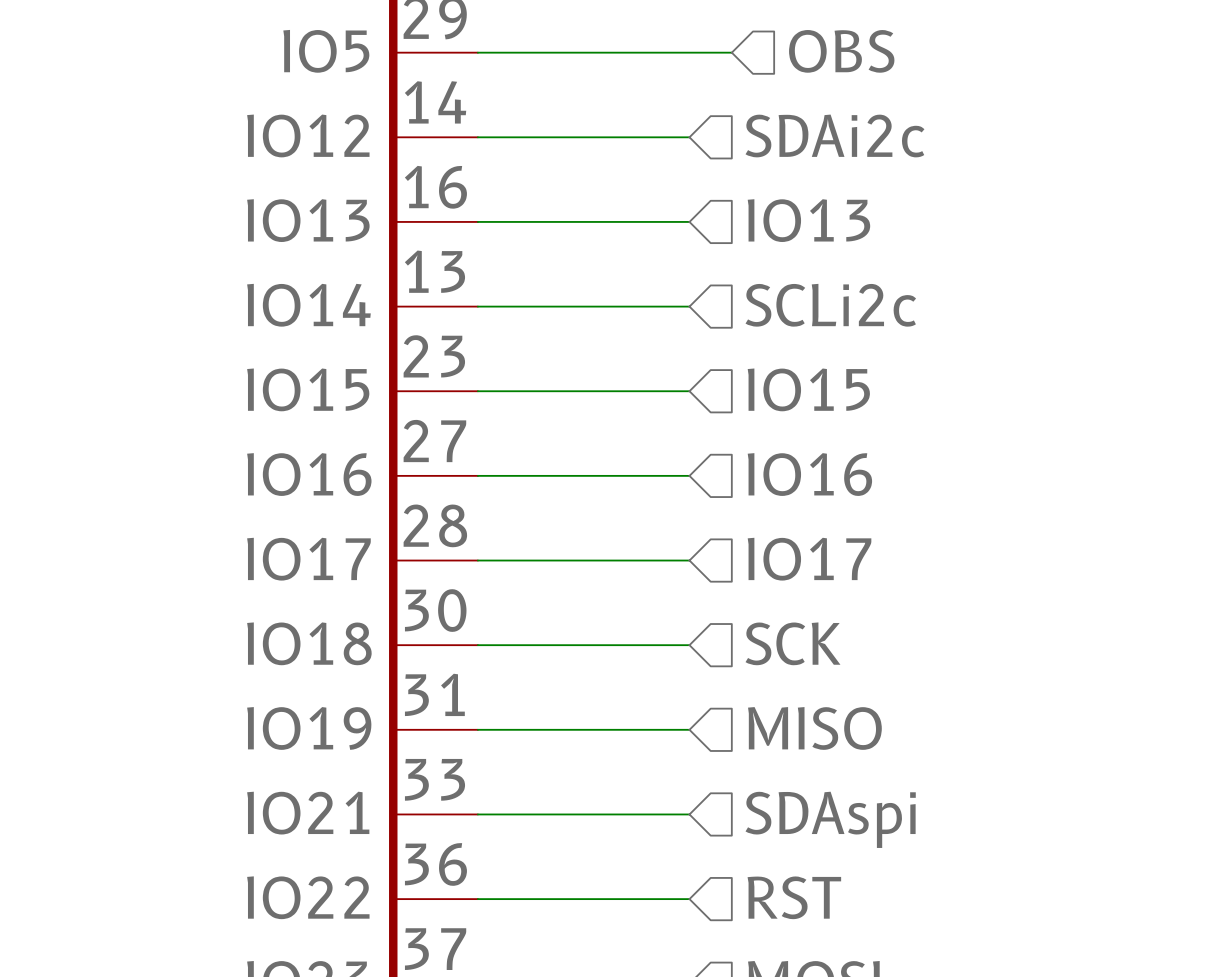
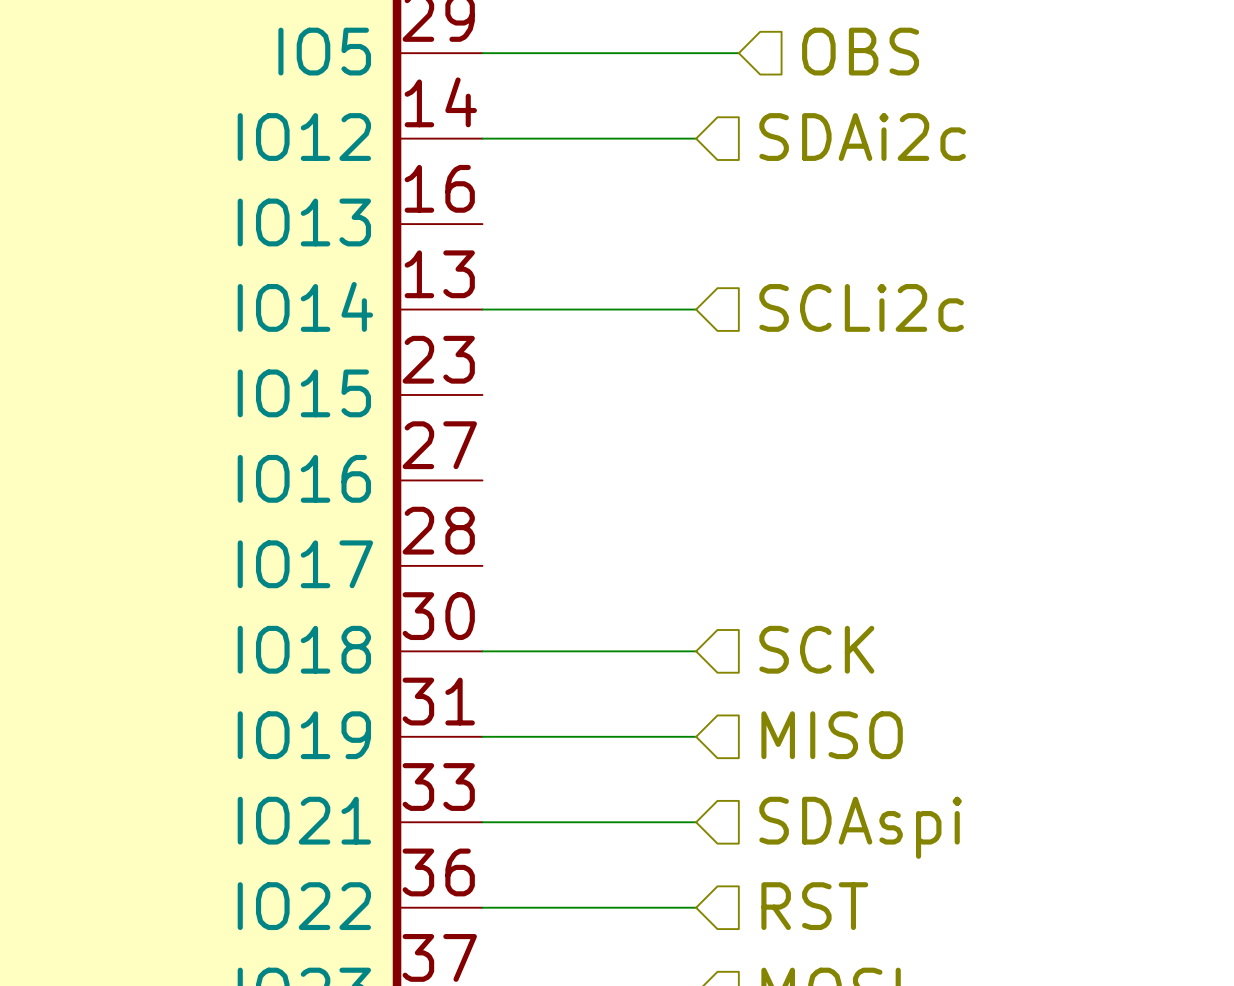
hierarchical label: IO13 (808, 220) -> none
wire: (477, 221) (689, 221) -> none
hierarchical label: IO15 (808, 389) -> none
wire: (477, 391) (689, 391) -> none
hierarchical label: IO16 (809, 474) -> none
wire: (477, 475) (689, 475) -> none
hierarchical label: IO17 (809, 559) -> none
wire: (477, 560) (689, 560) -> none

